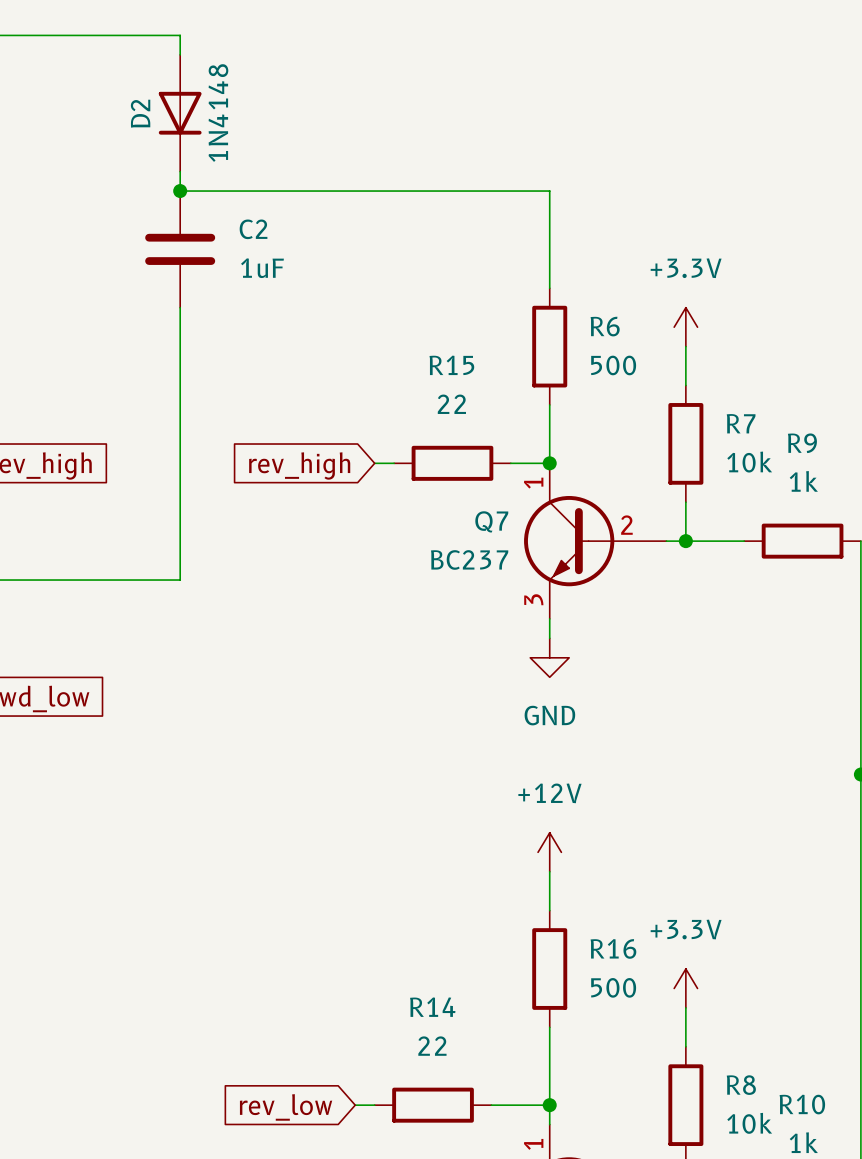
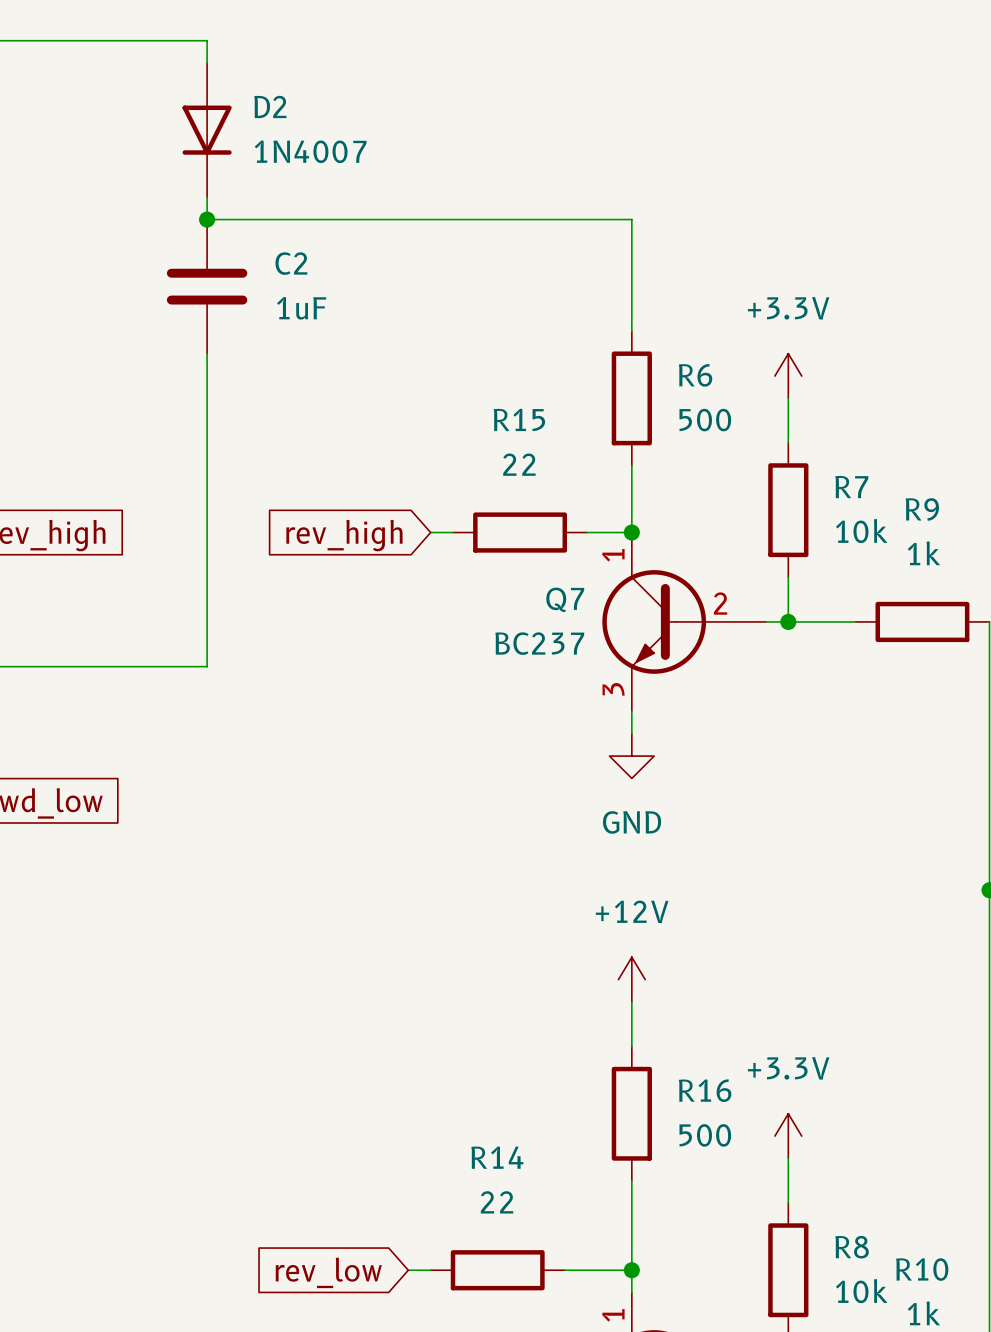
D2 name rotation: 0° (140, 113) -> 90° clockwise (270, 106)
D2 name position: D2 (140, 113) -> D2 (270, 106)
D2 value: 1N4148 (218, 113) -> 1N4007 (310, 151)

